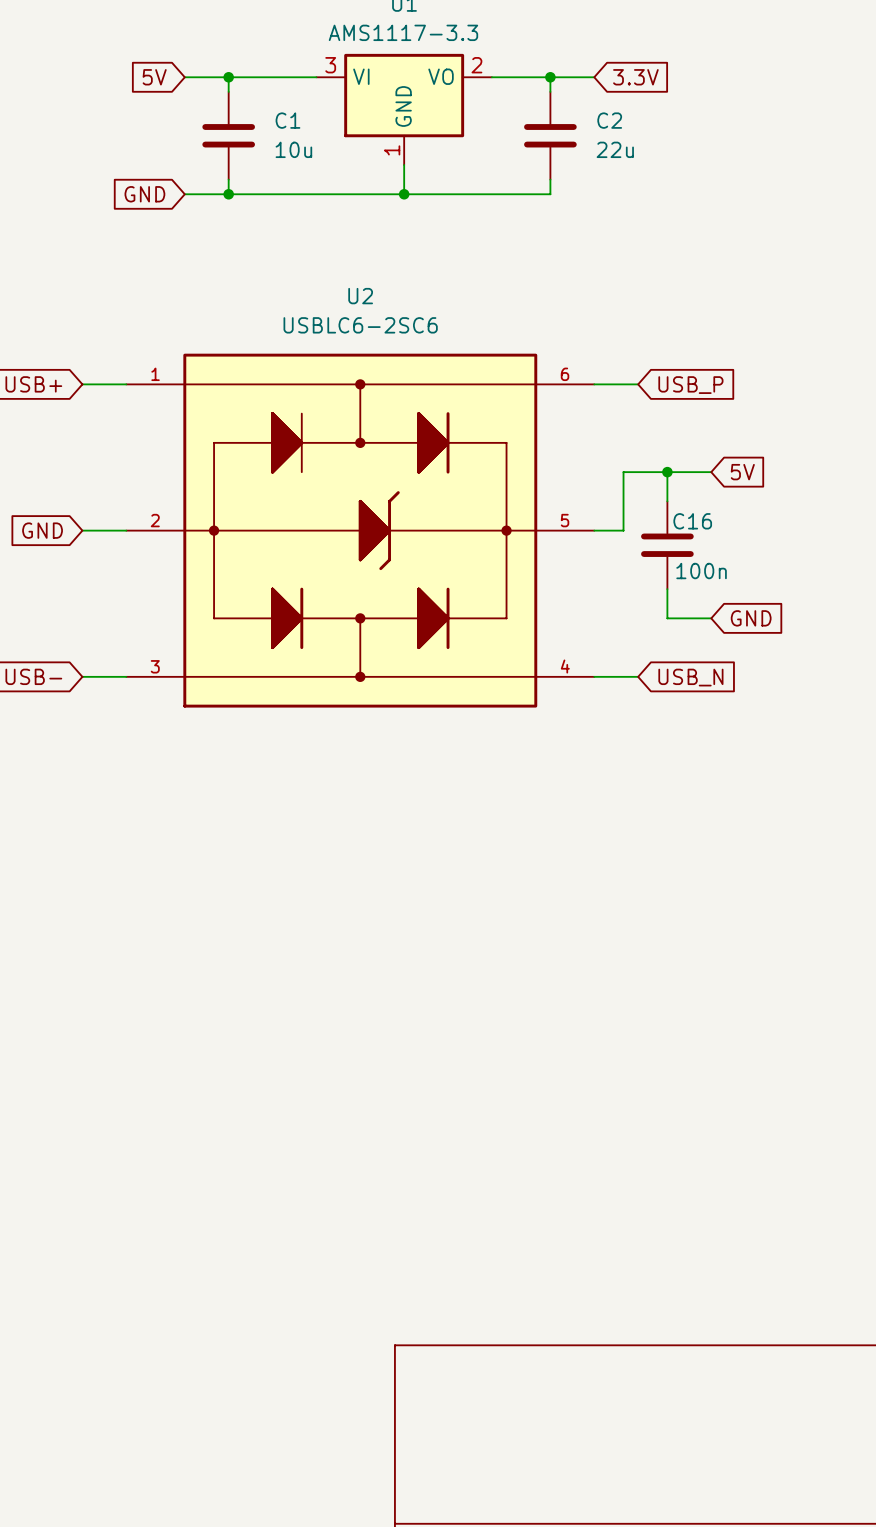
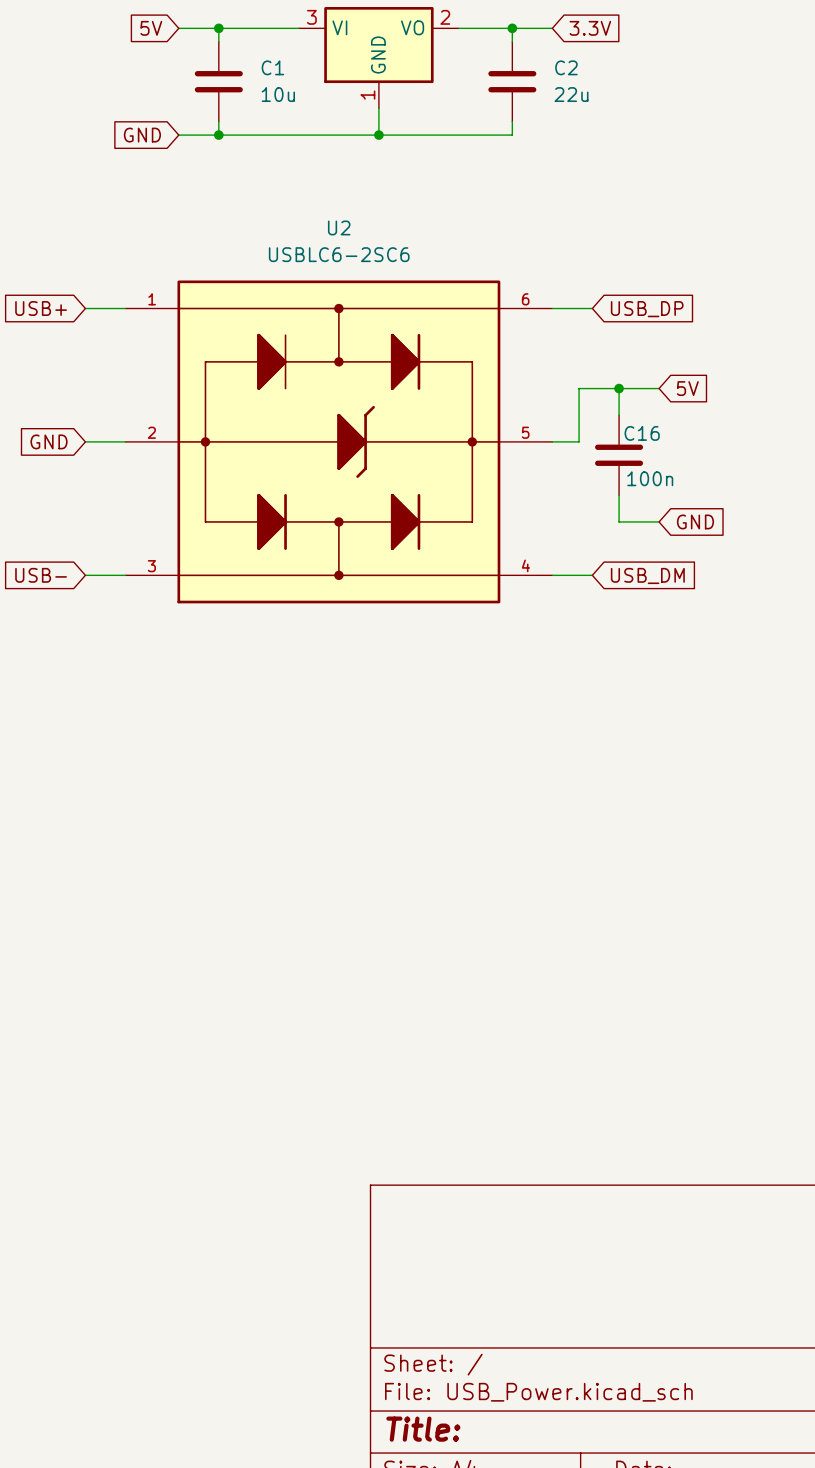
global label: USB_P (690, 385) -> USB_DP (647, 309)
global label: USB_N (690, 677) -> USB_DM (647, 575)

